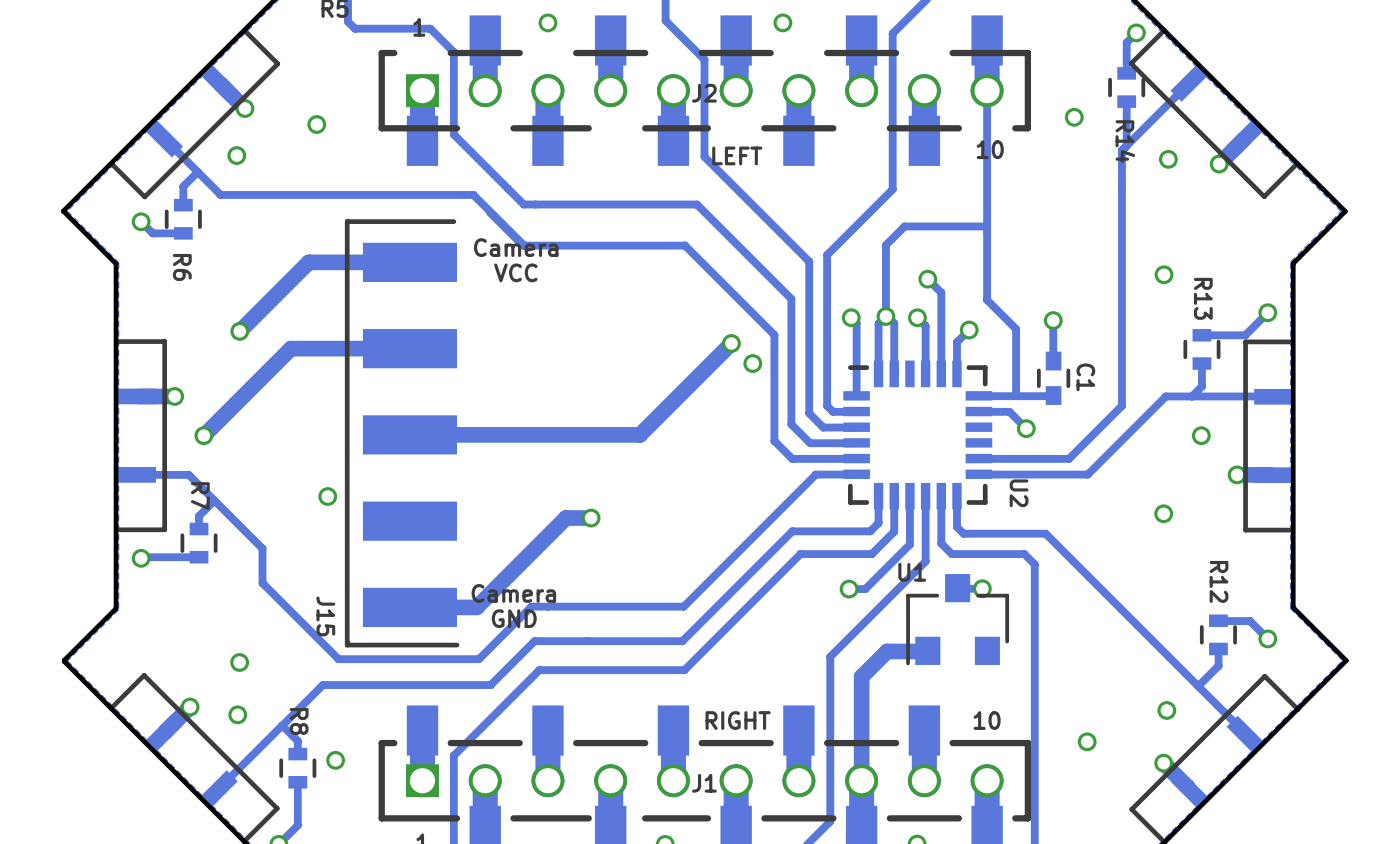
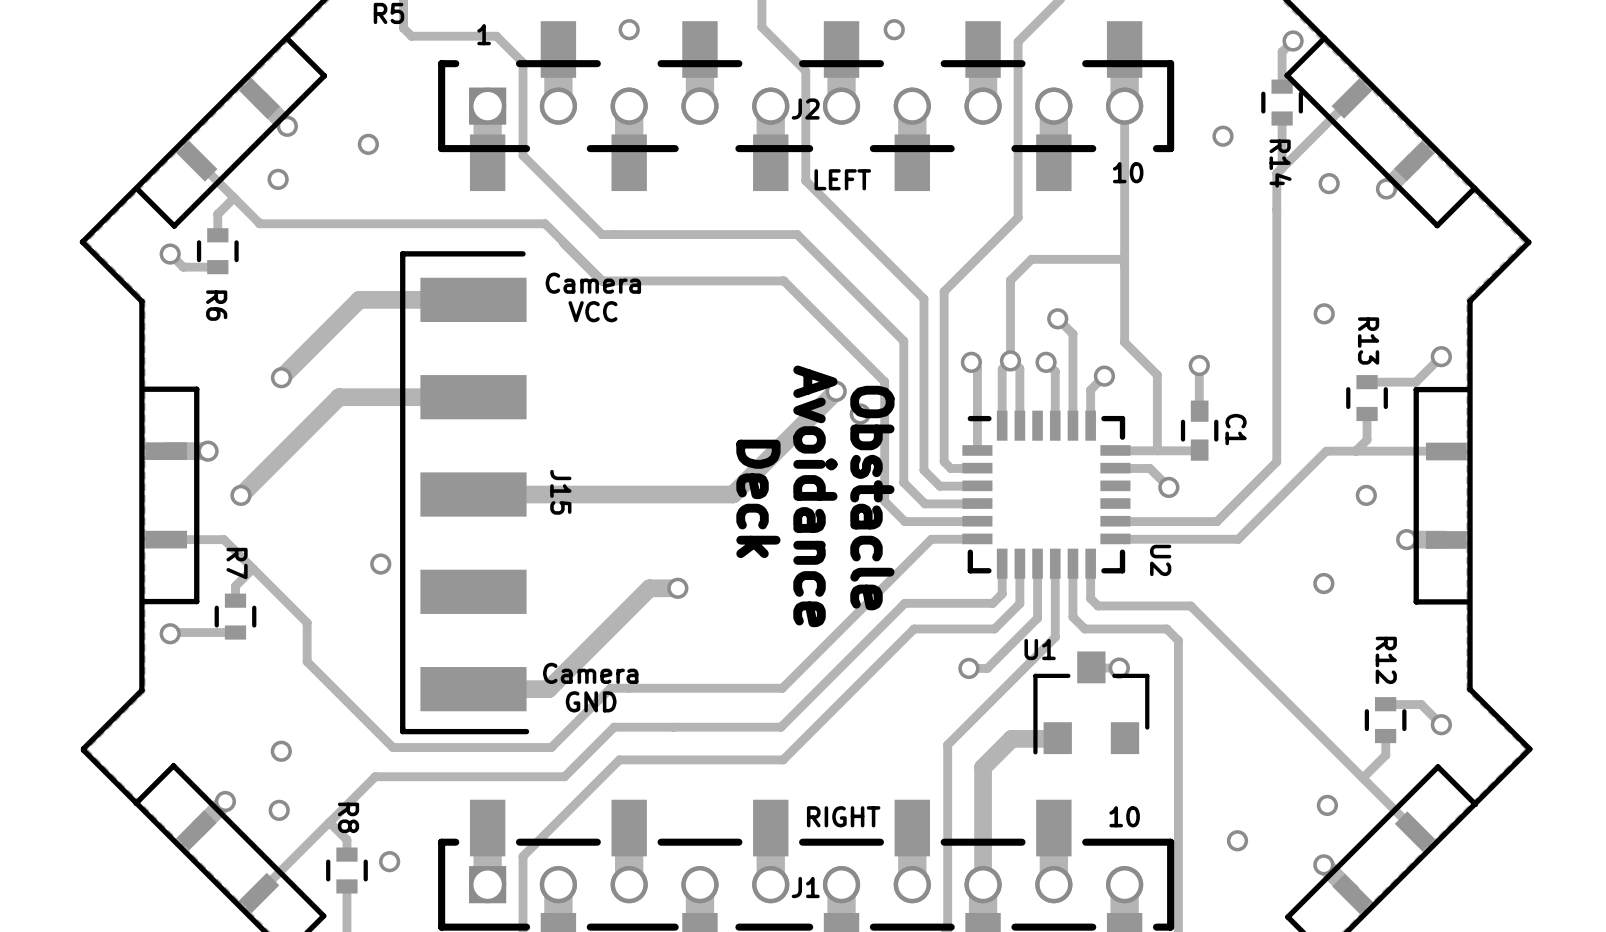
text: none -> Avoidance (815, 496)
text: none -> Deck (758, 498)
text: none -> Obstacle (872, 498)
J15 name position: J15 (325, 616) -> J15 (560, 492)

